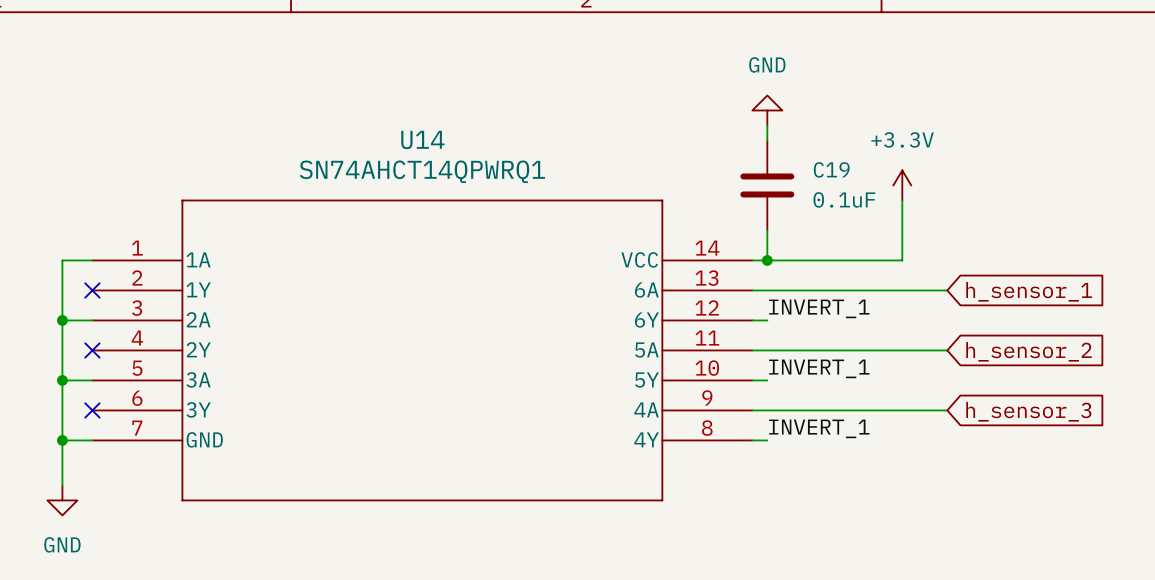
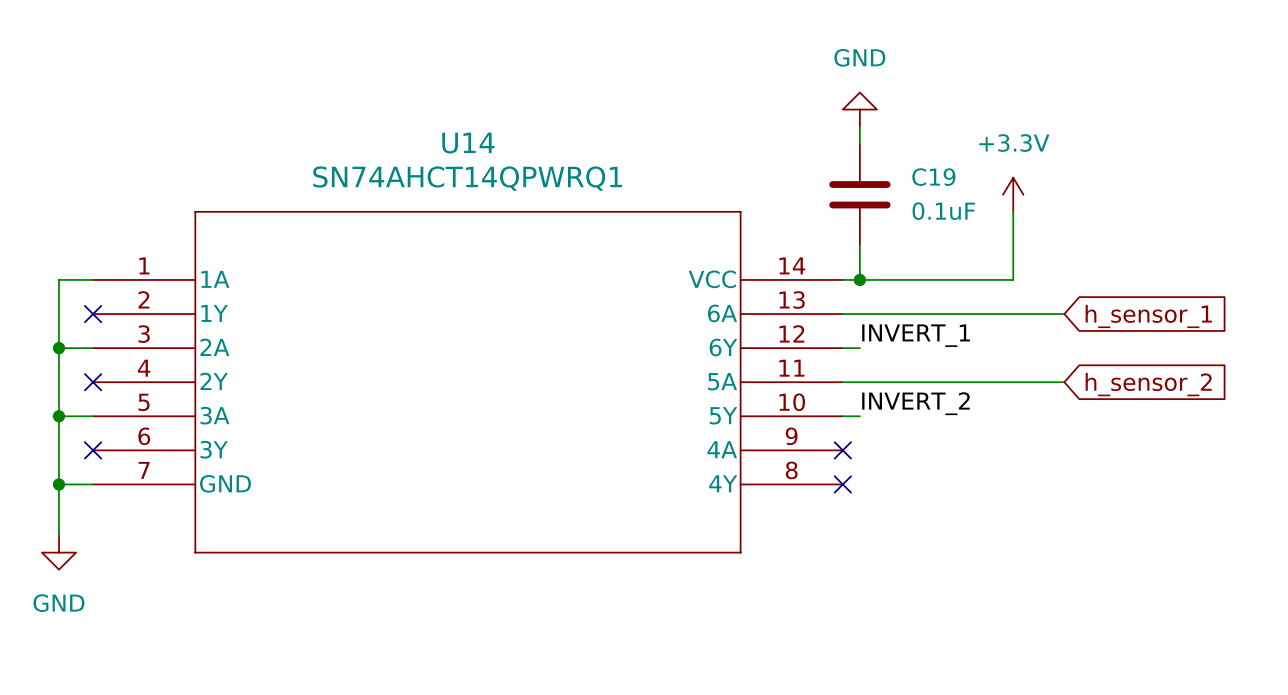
label: INVERT_1 (819, 368) -> INVERT_2 (915, 403)
wire: (752, 410) (947, 410) -> none
no-connect mark: none -> (842, 450)
global label: h_sensor_3 (1028, 411) -> none
label: INVERT_1 (819, 428) -> none
wire: (752, 440) (767, 440) -> none
no-connect mark: none -> (842, 484)

